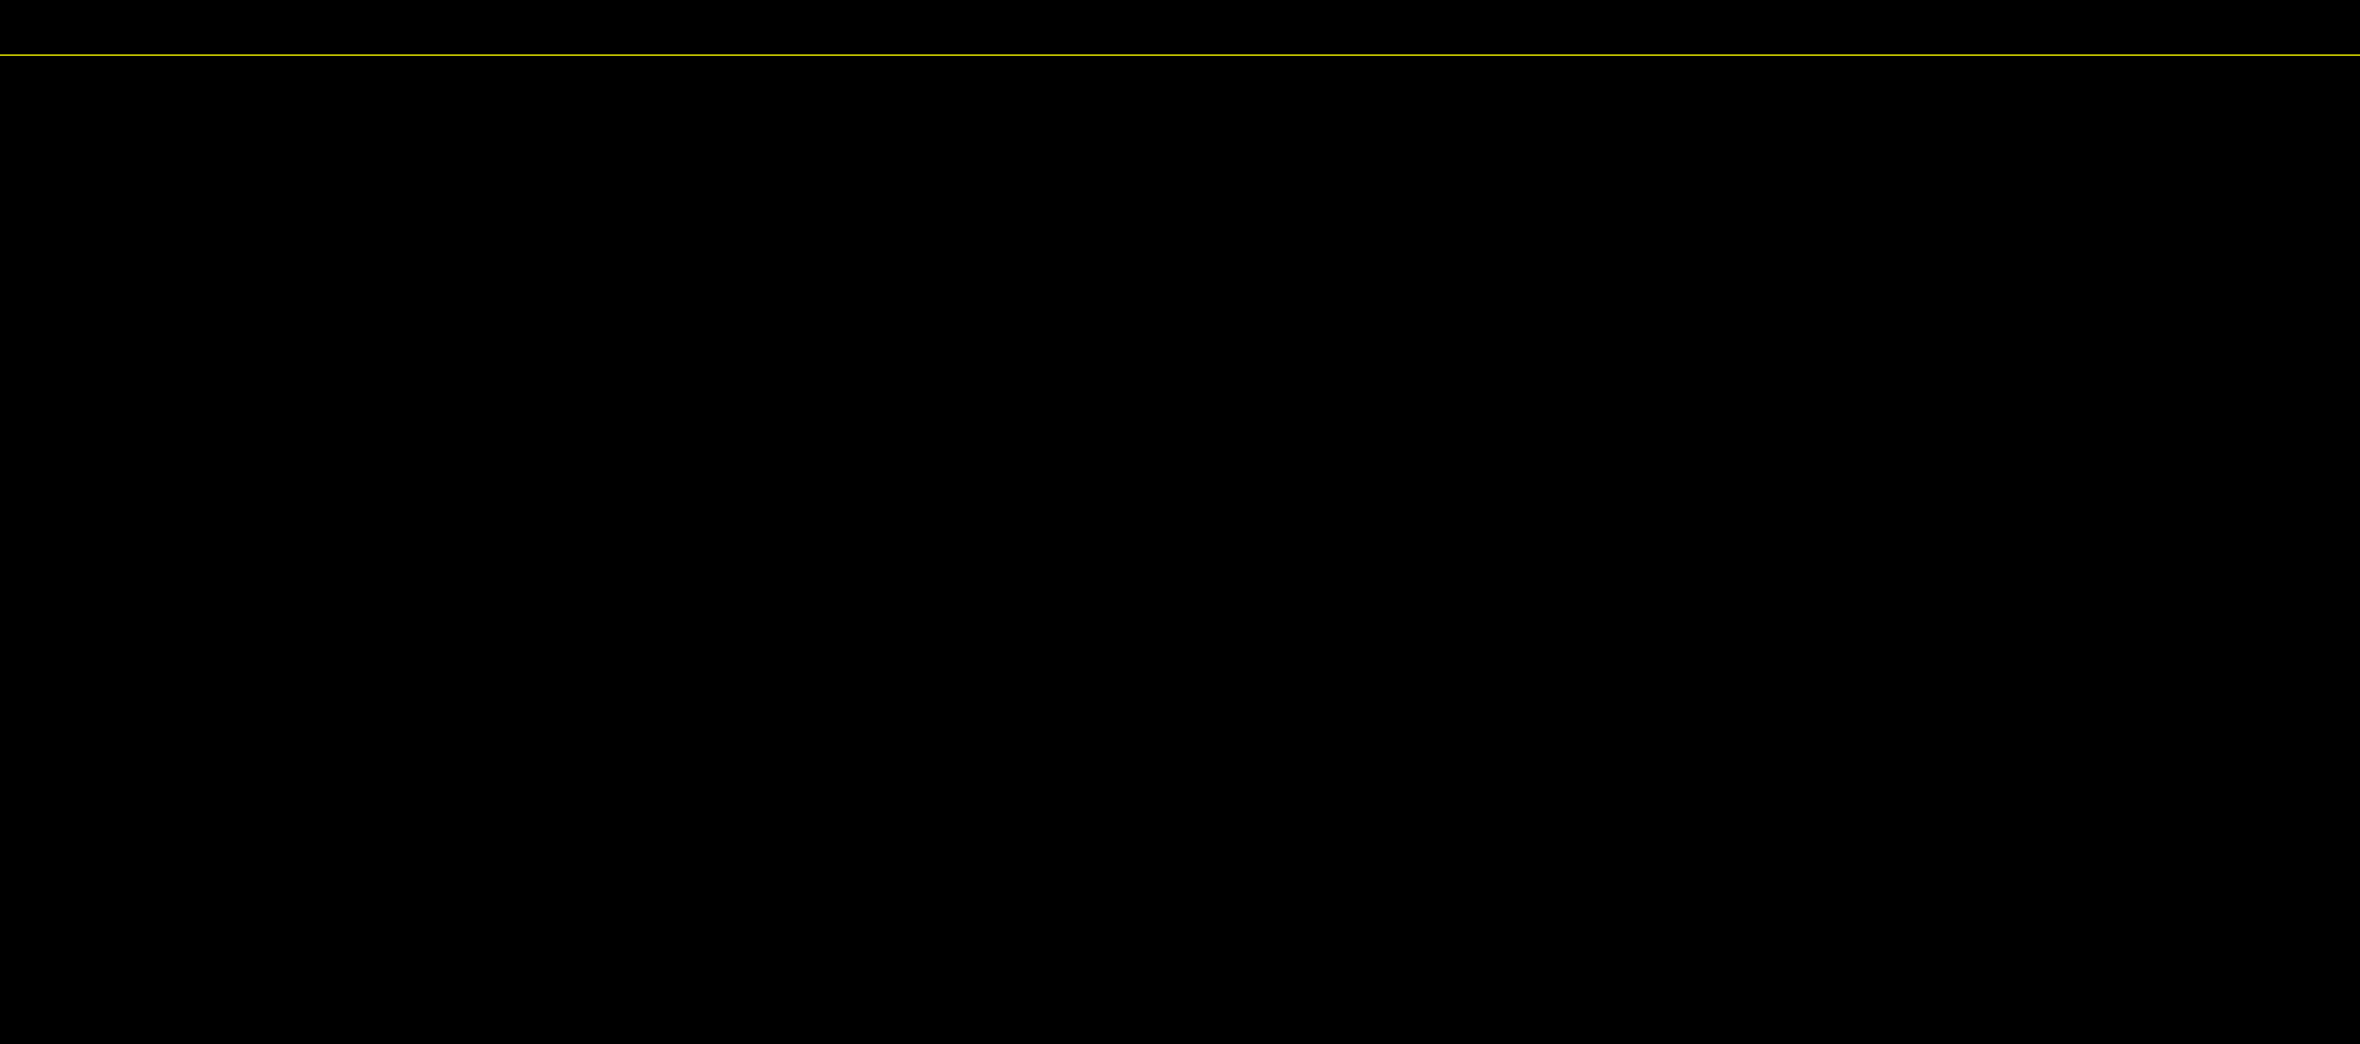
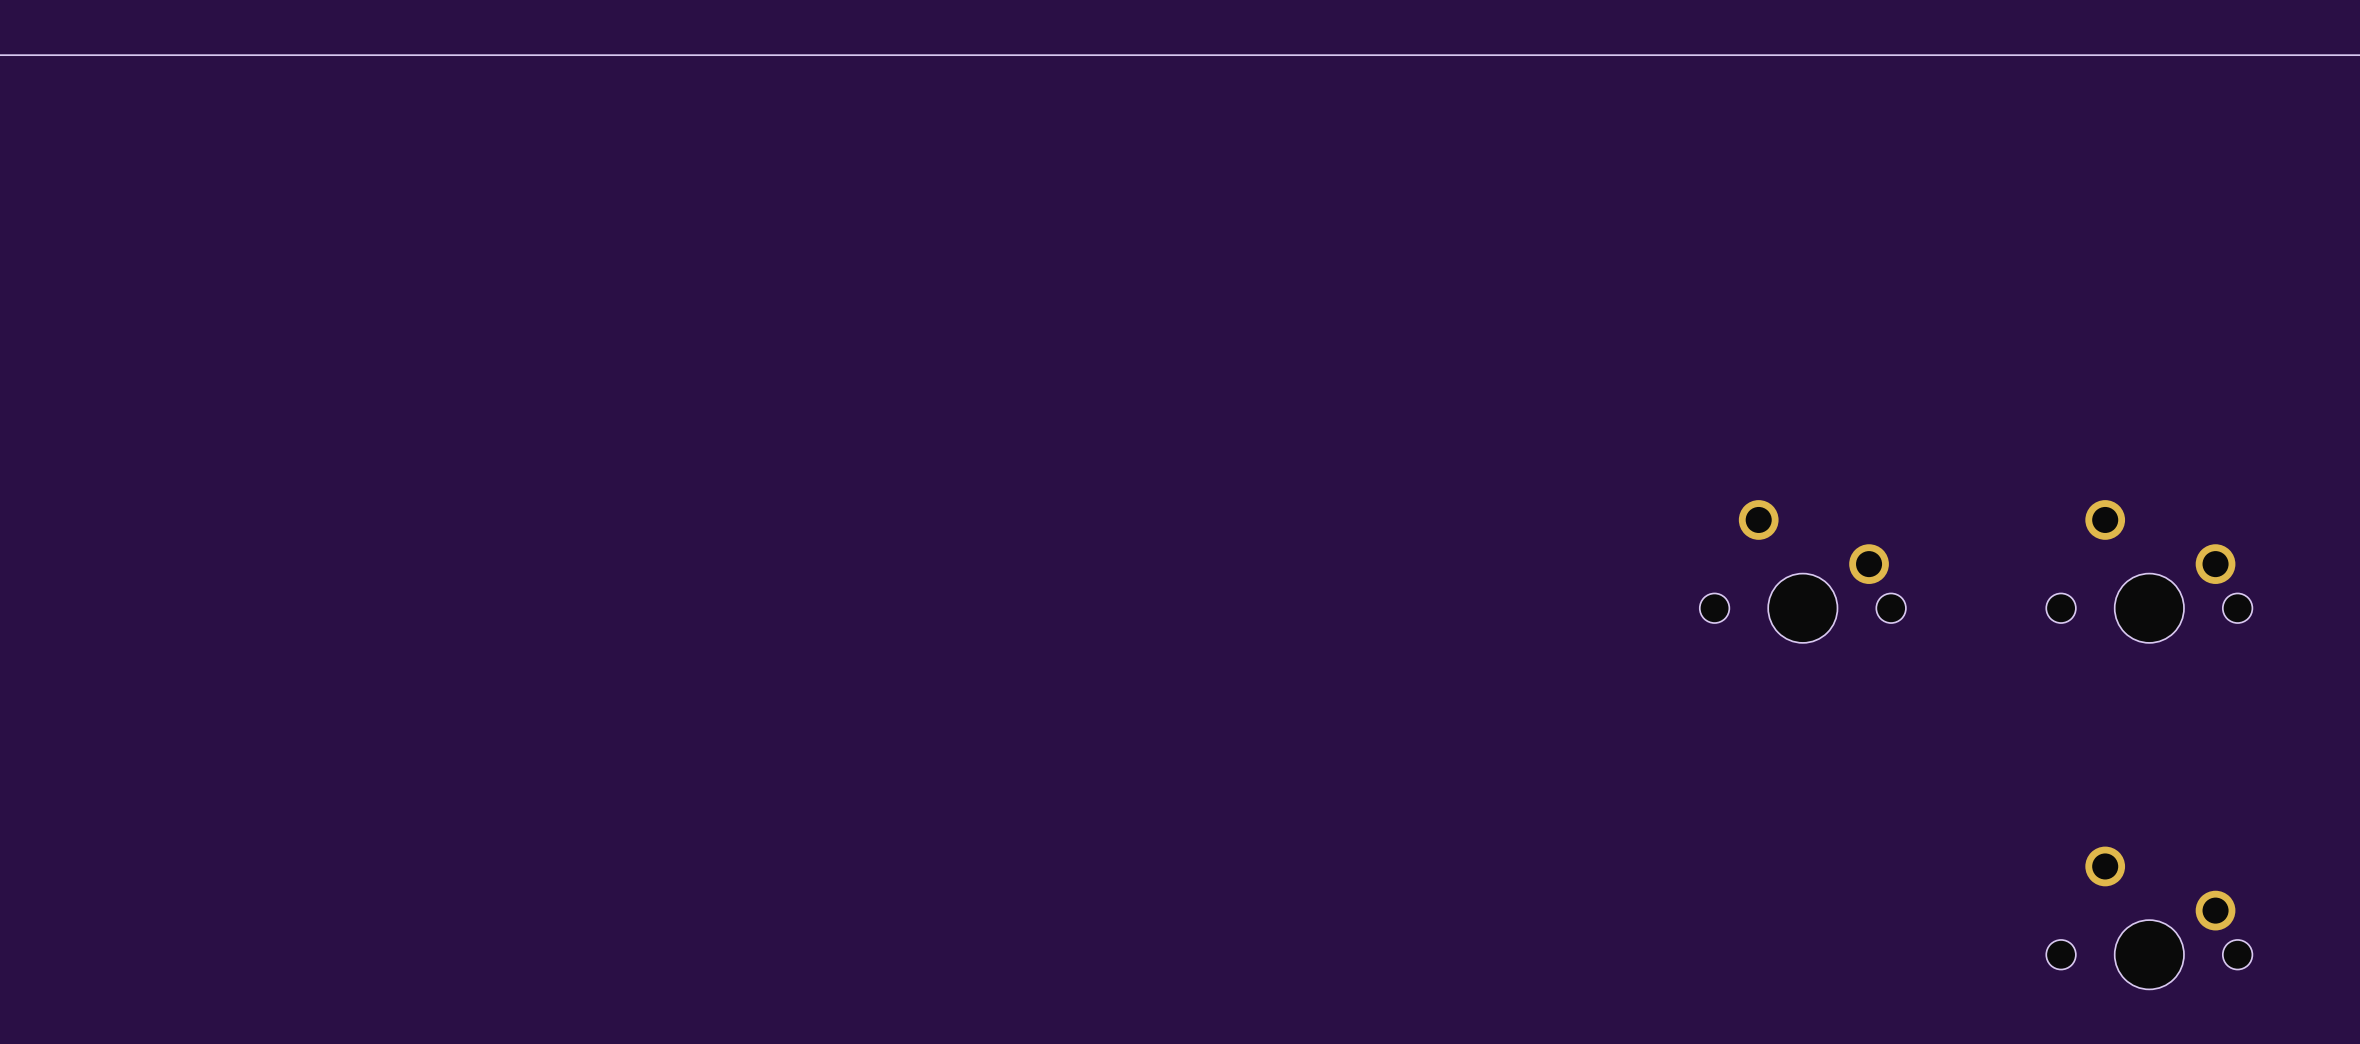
part: none -> (1802, 571)
part: none -> (2149, 571)
part: none -> (2149, 917)

